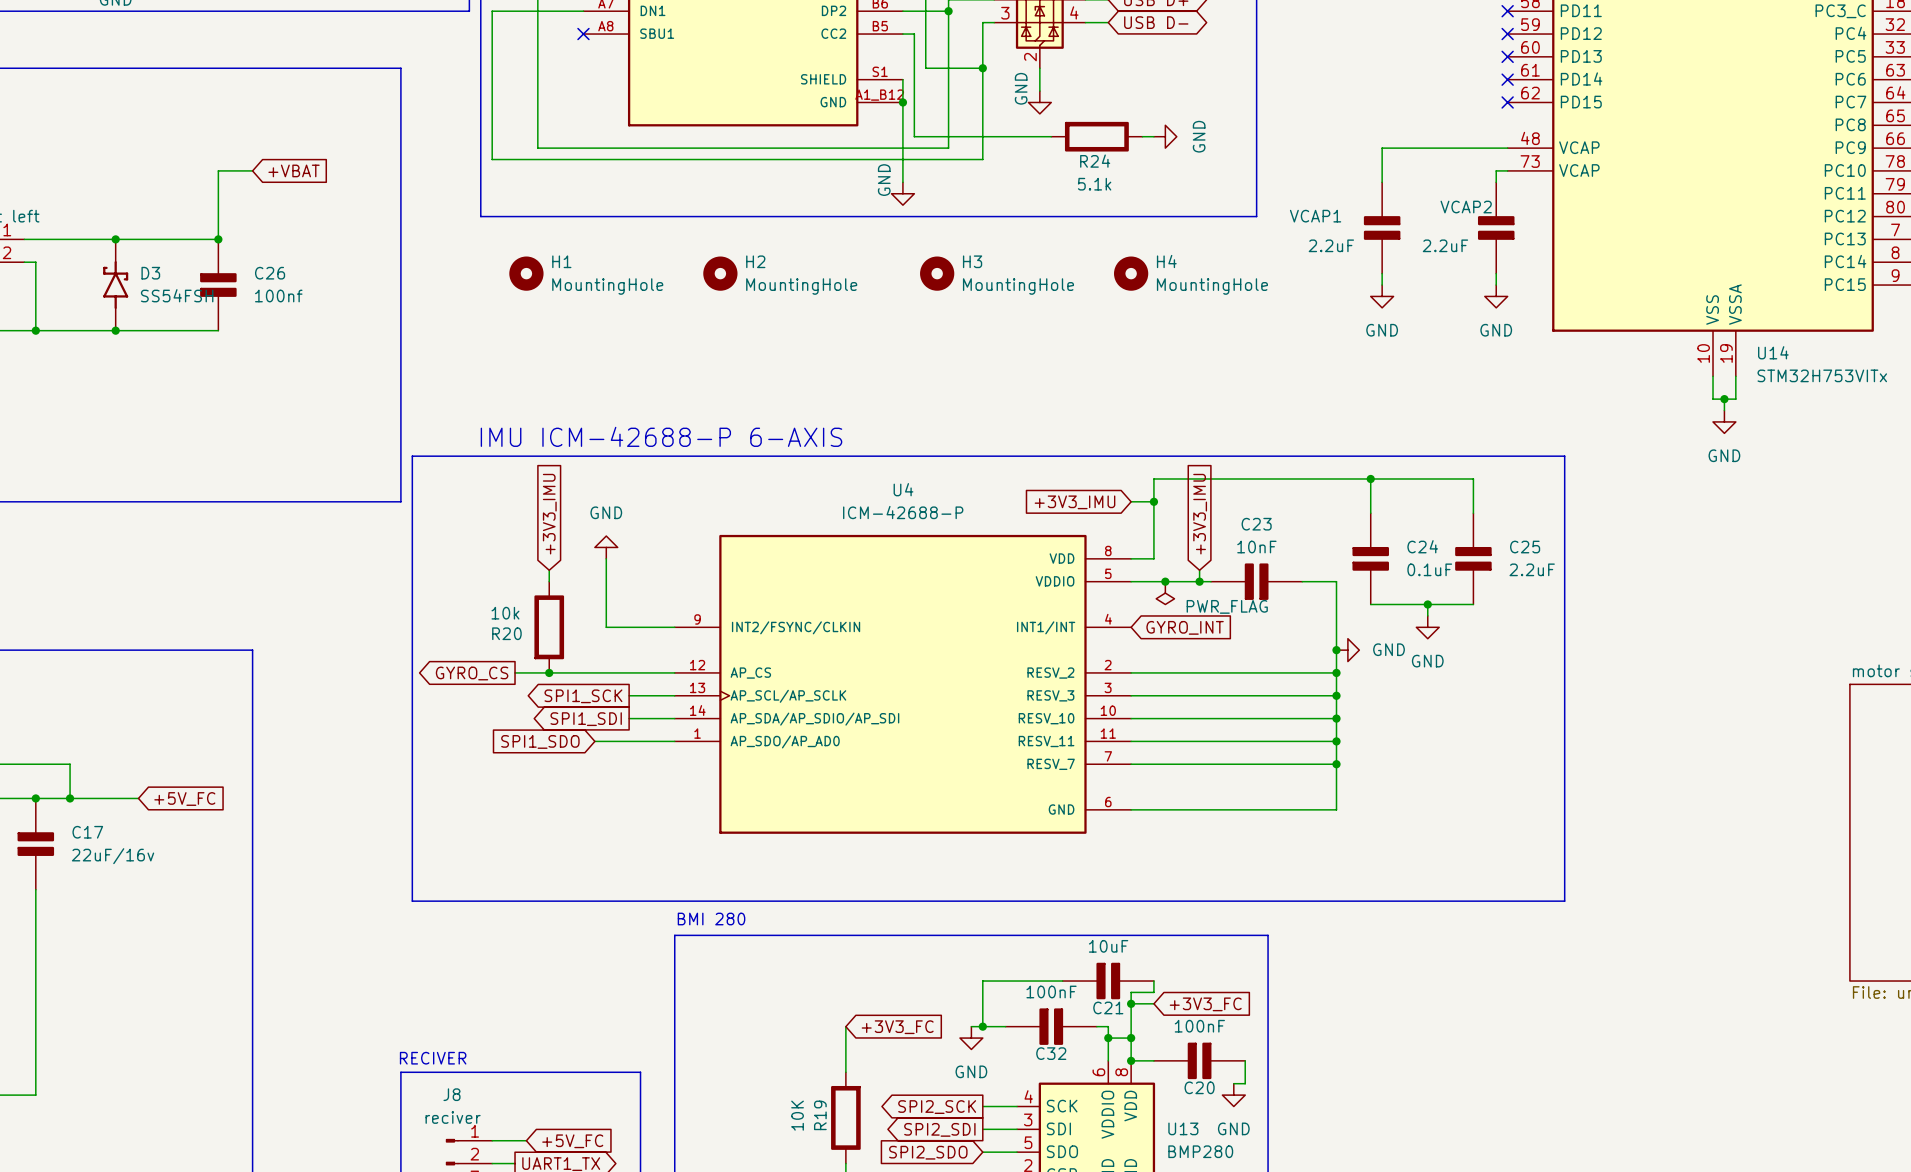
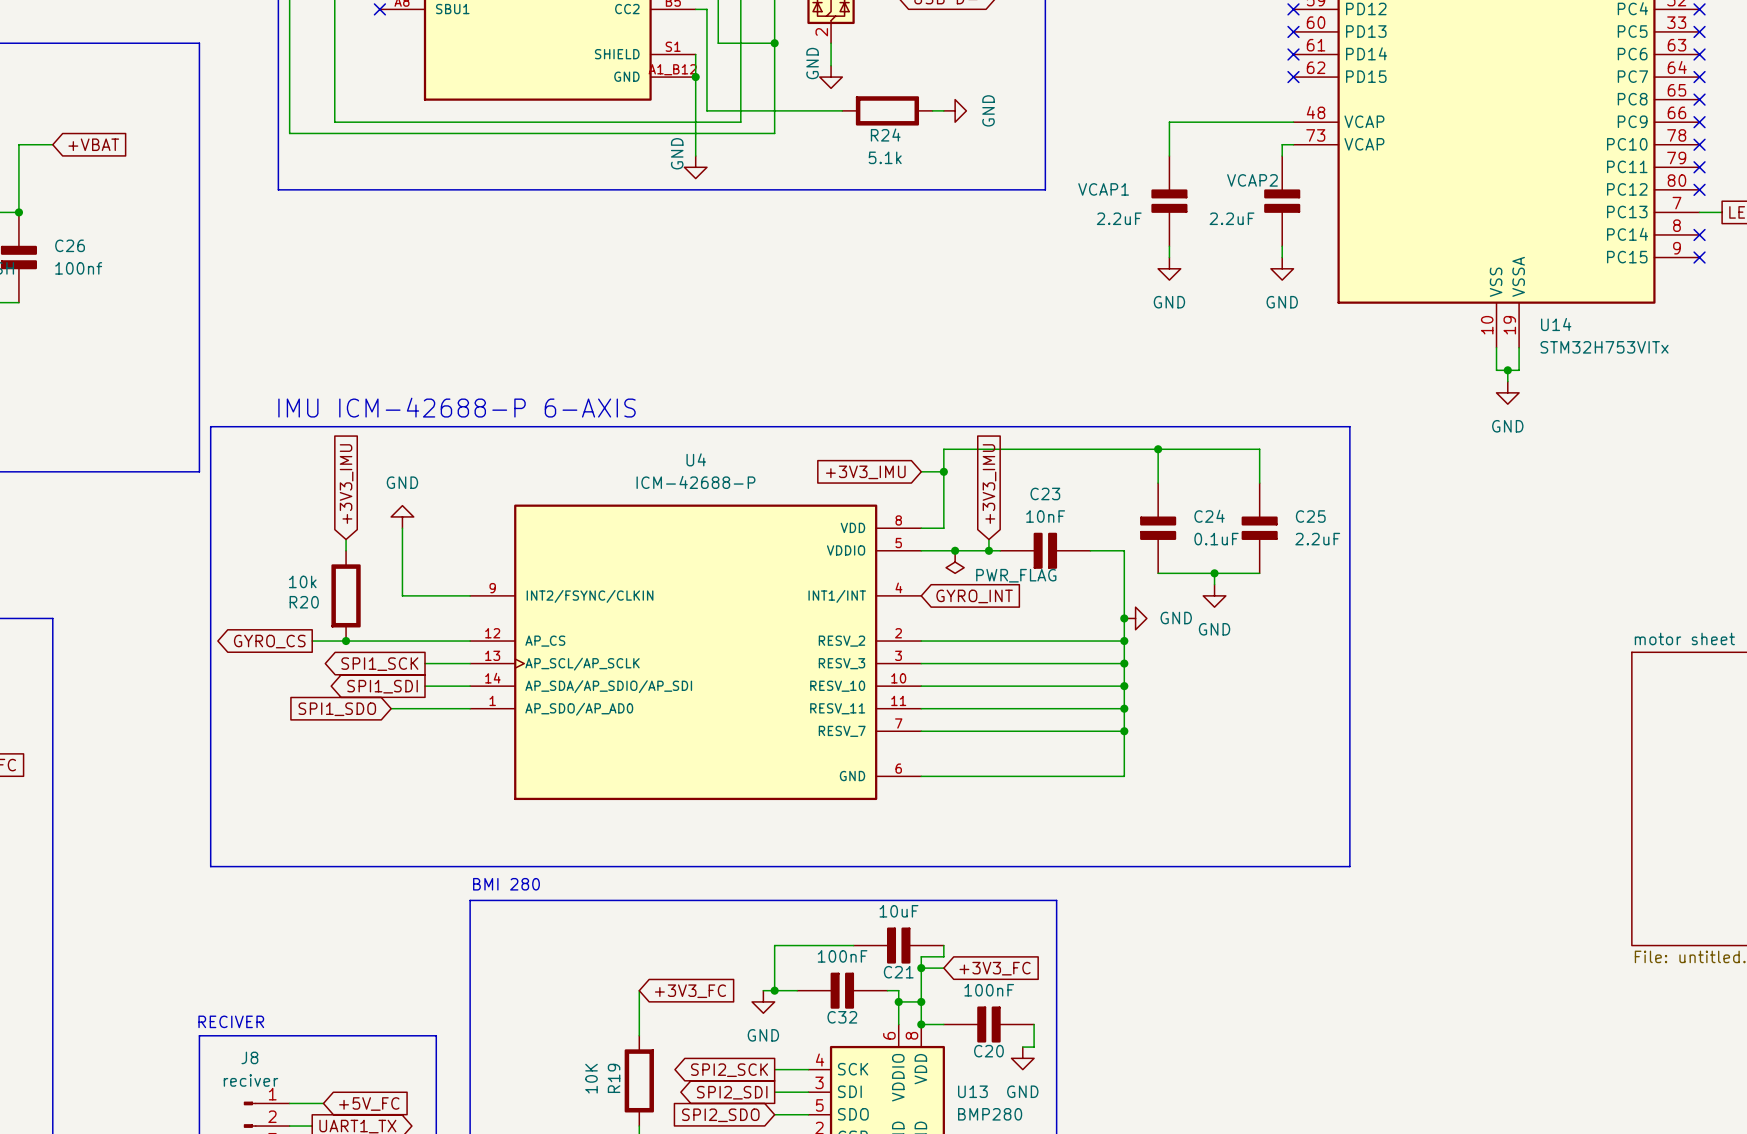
H1: MountingHole (526, 273) -> none
H2: MountingHole (720, 273) -> none
H3: MountingHole (937, 273) -> none
H4: MountingHole (1131, 273) -> none

